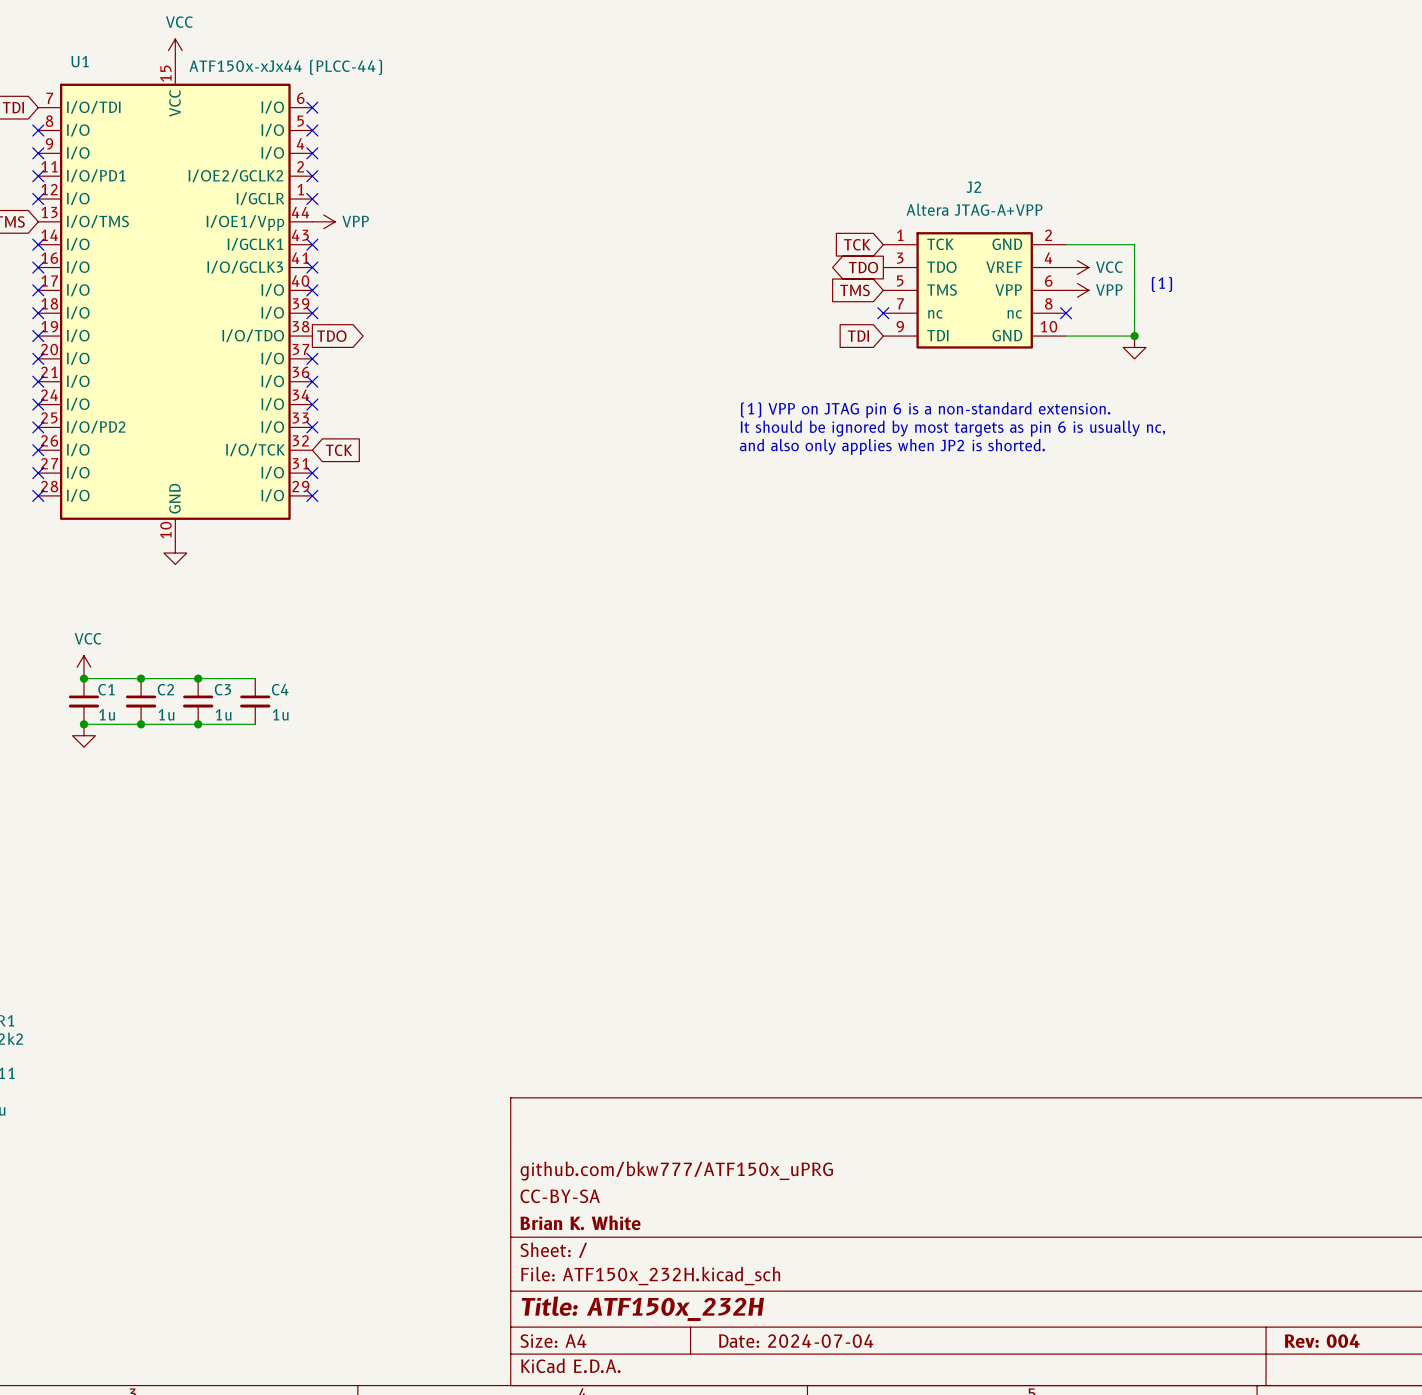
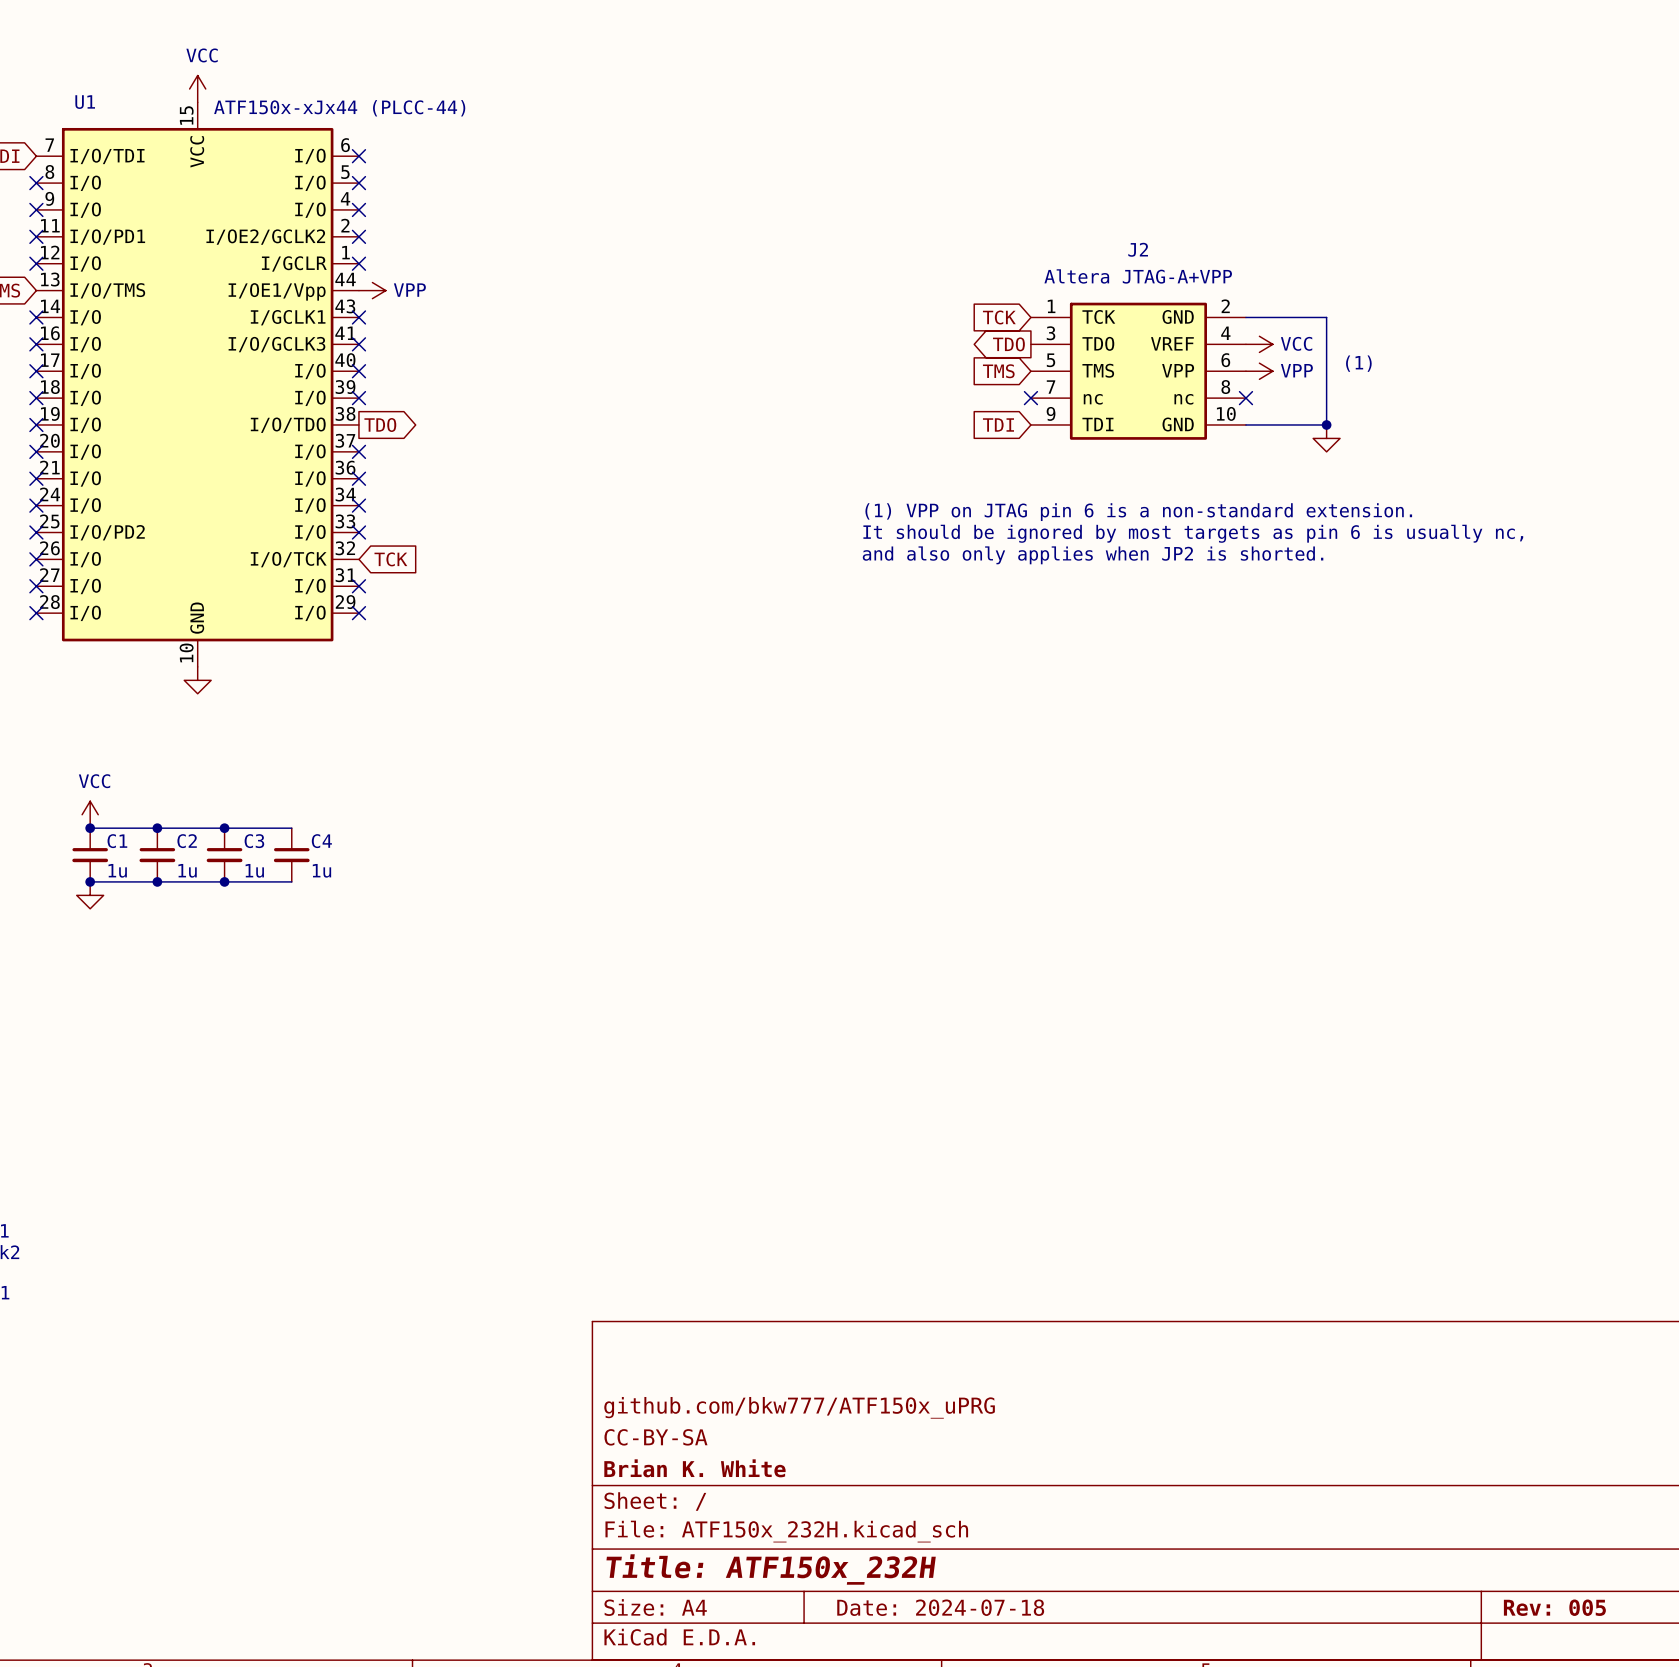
title block: Date: 2024-07-04 (796, 1341) -> Date: 2024-07-18 (940, 1607)
title block: Rev: 004 (1322, 1341) -> Rev: 005 (1554, 1607)

